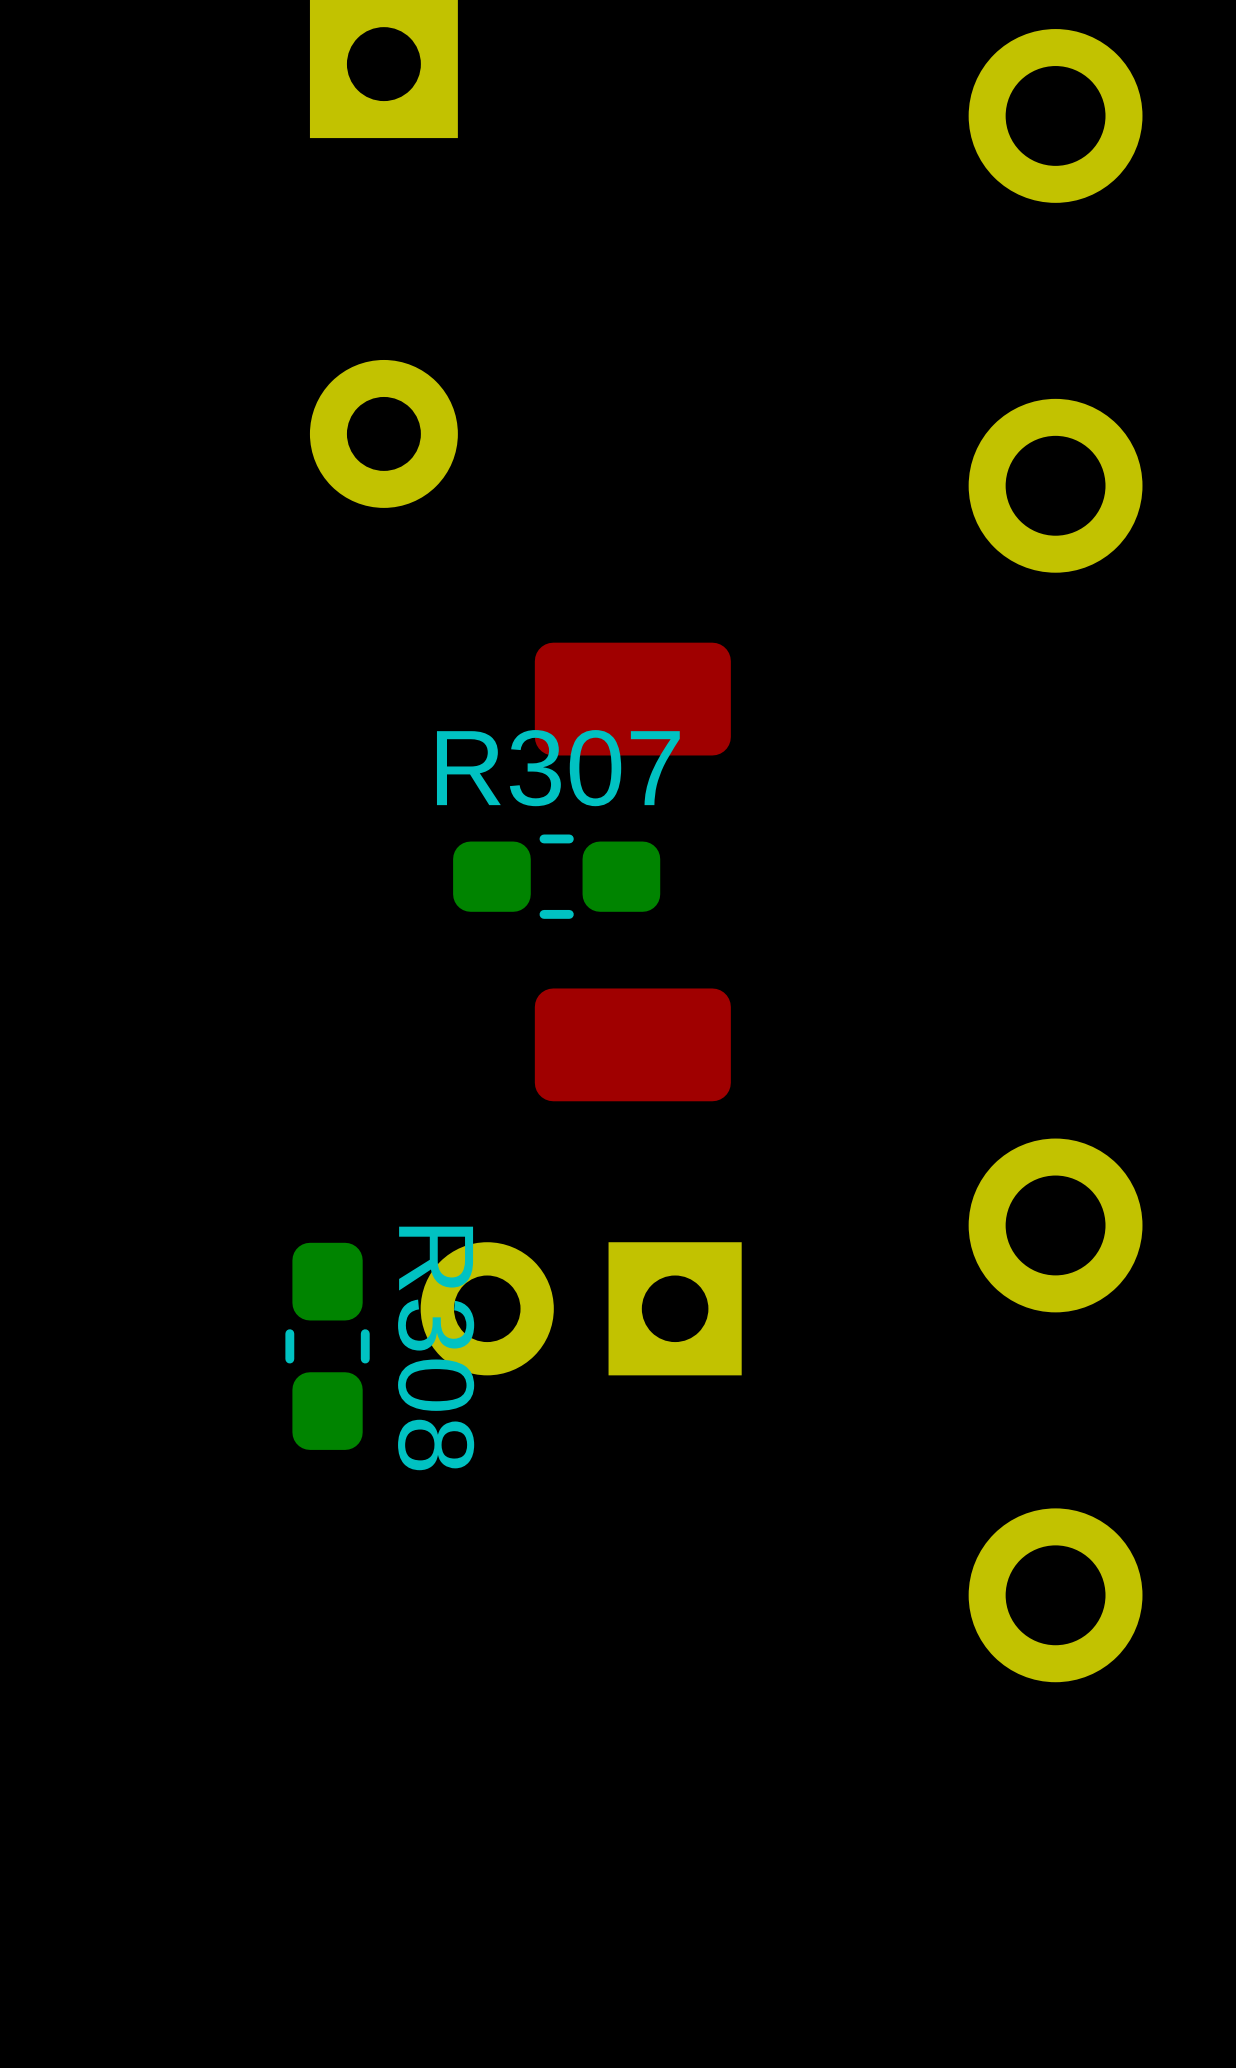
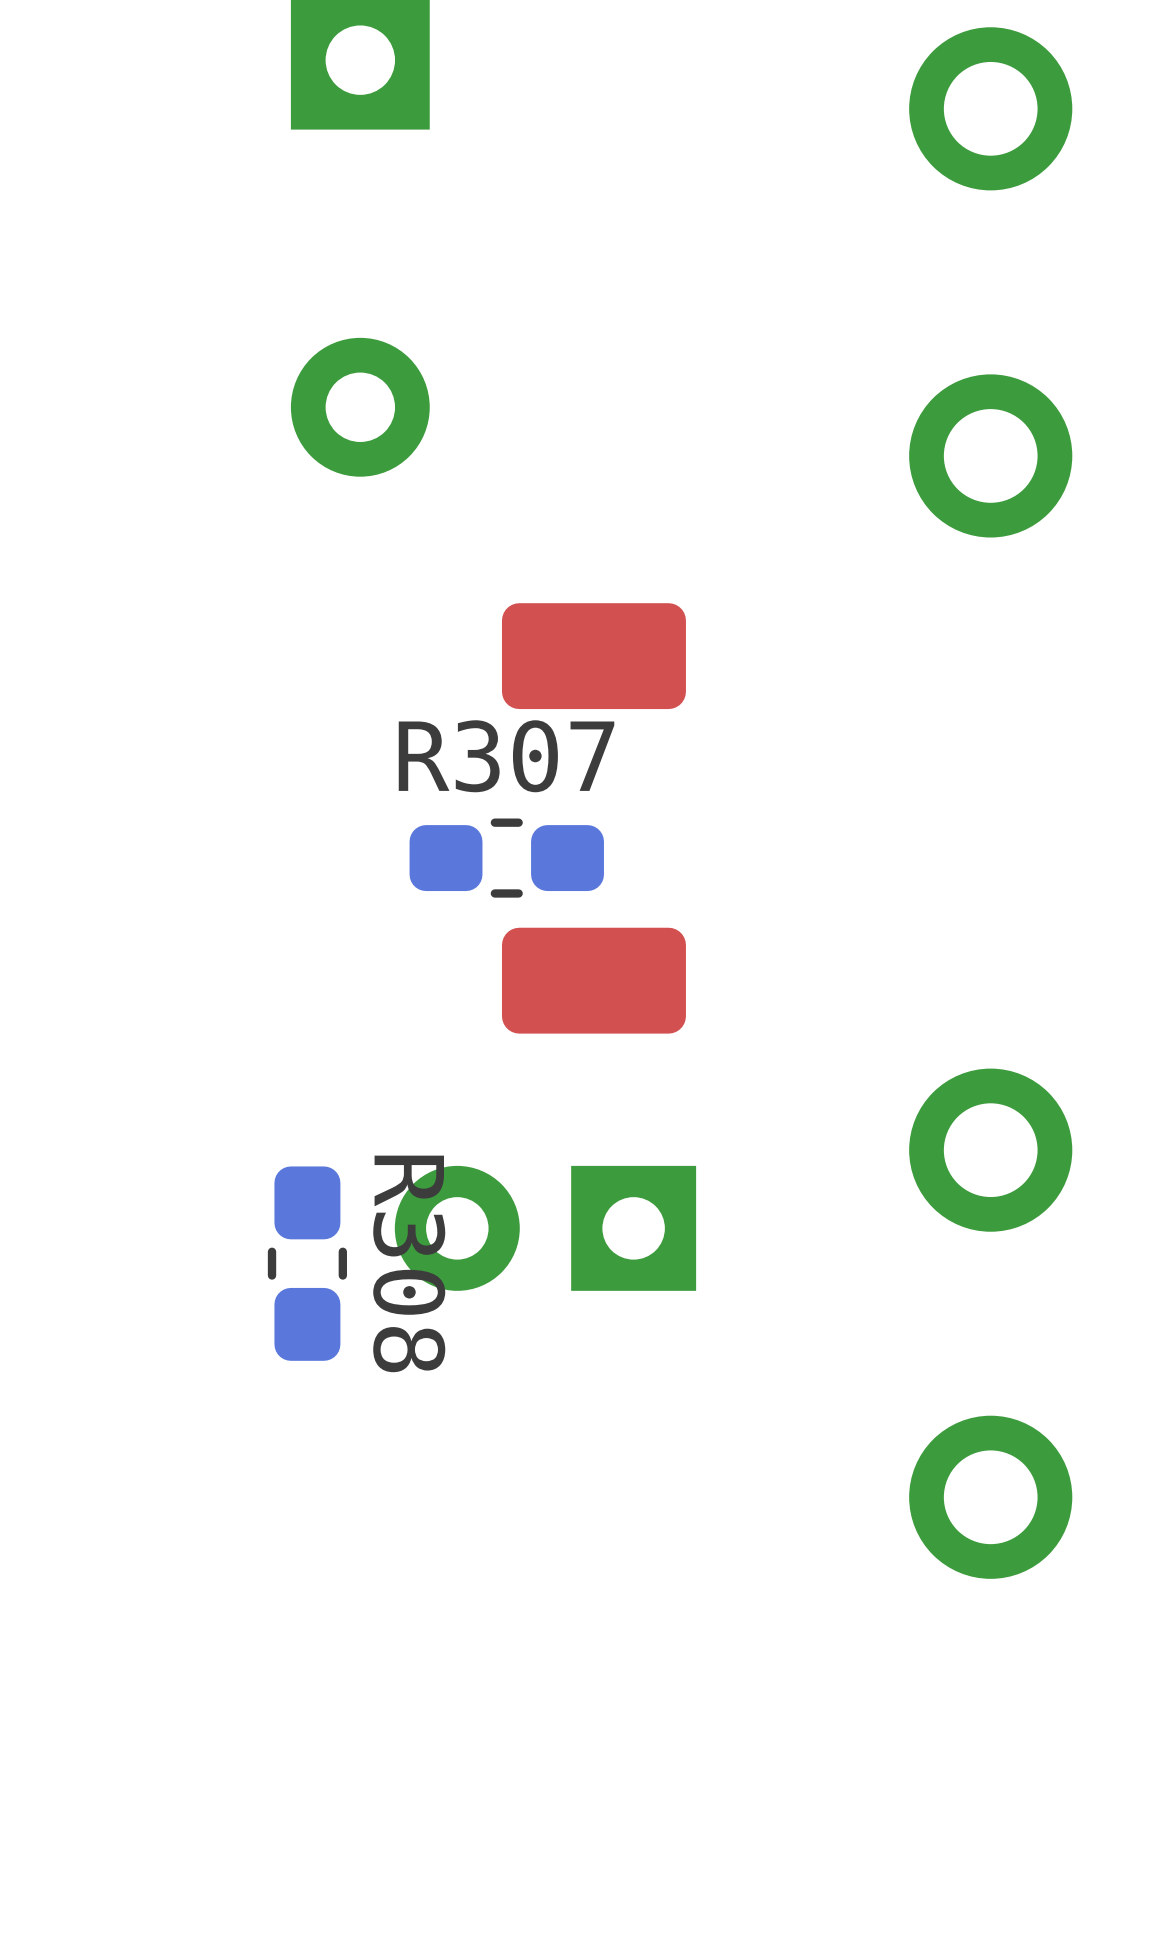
R307 position: (556, 876) -> (506, 858)

